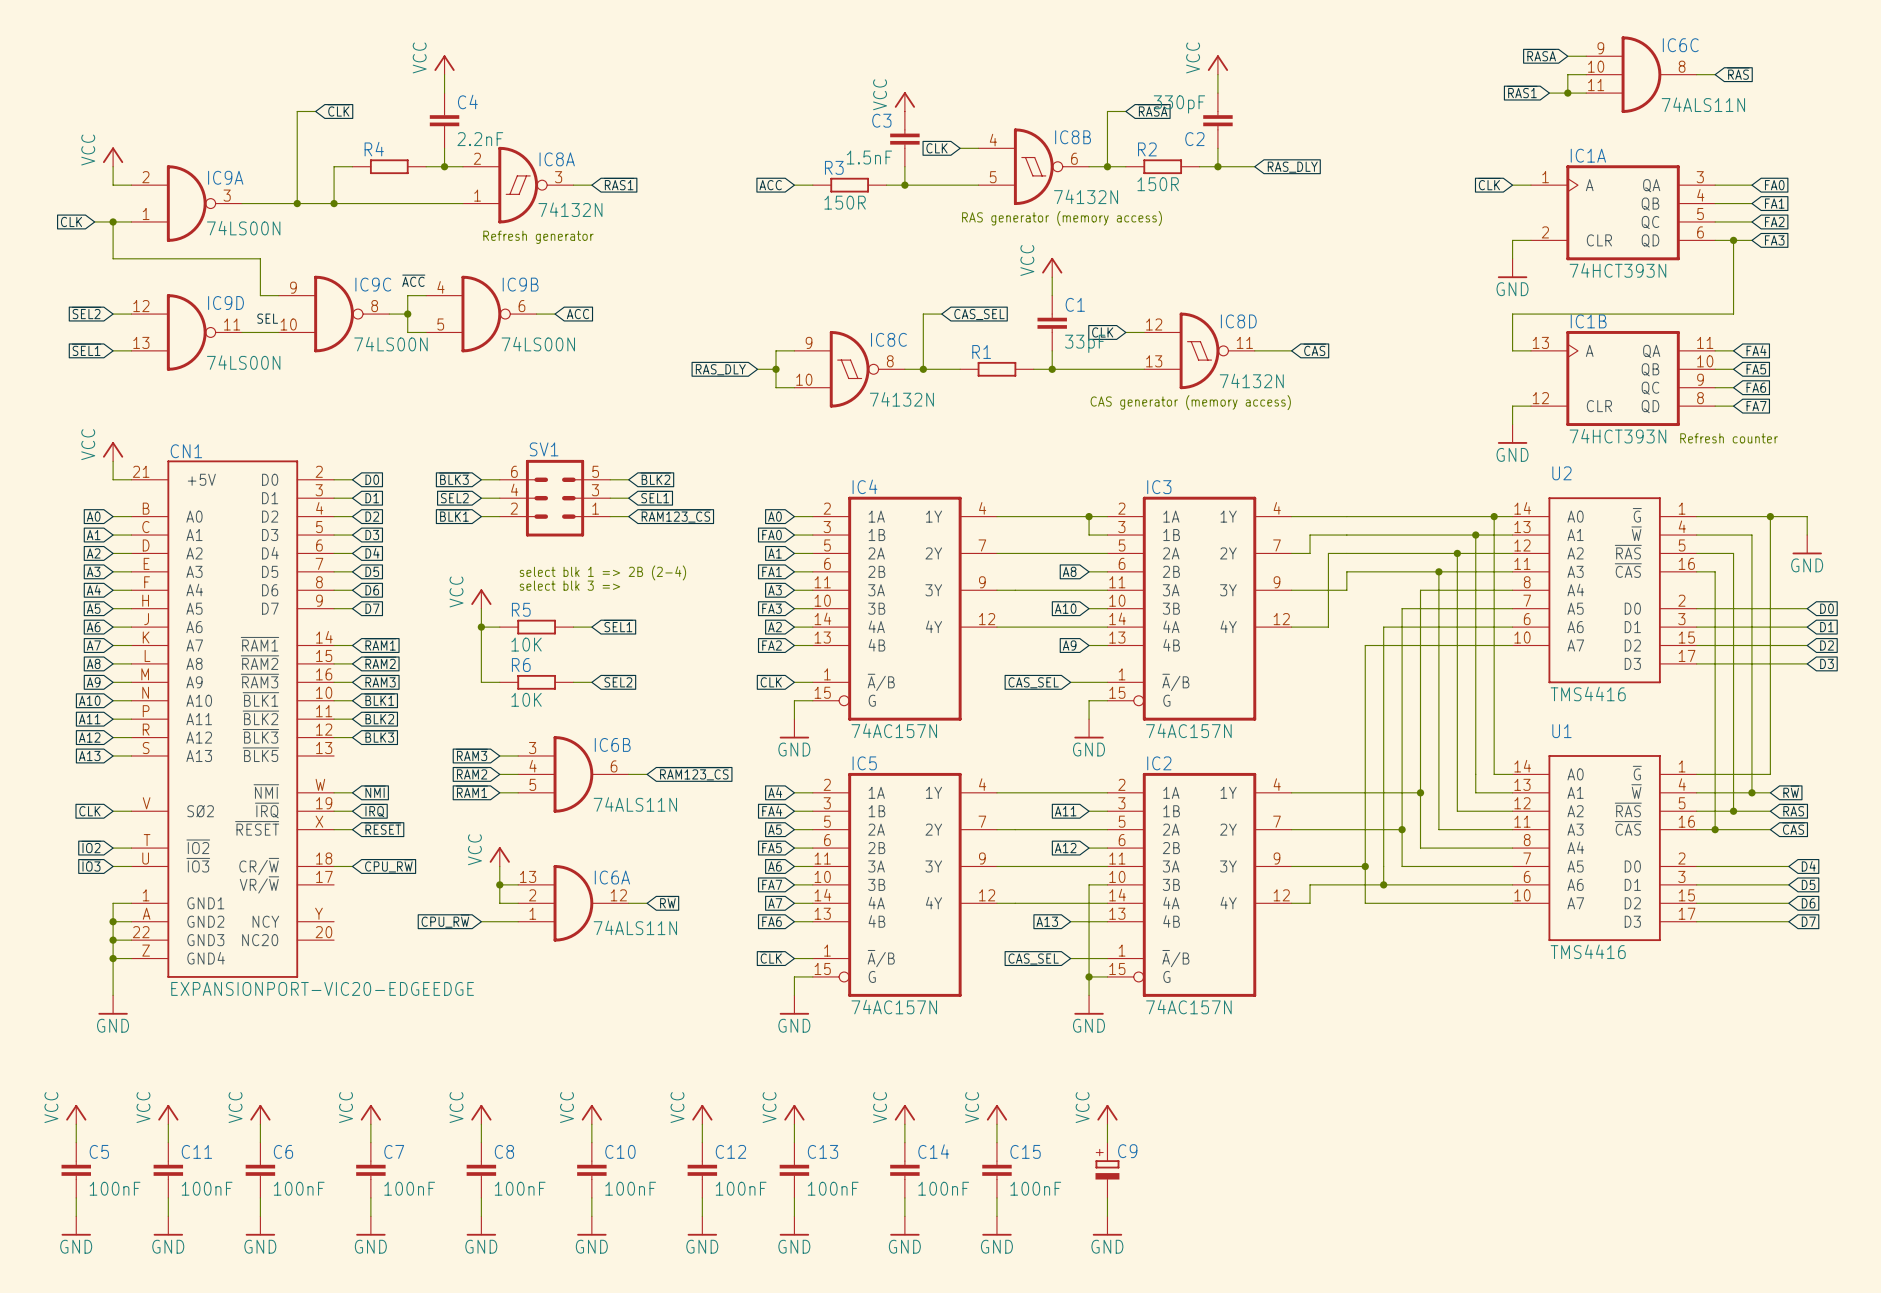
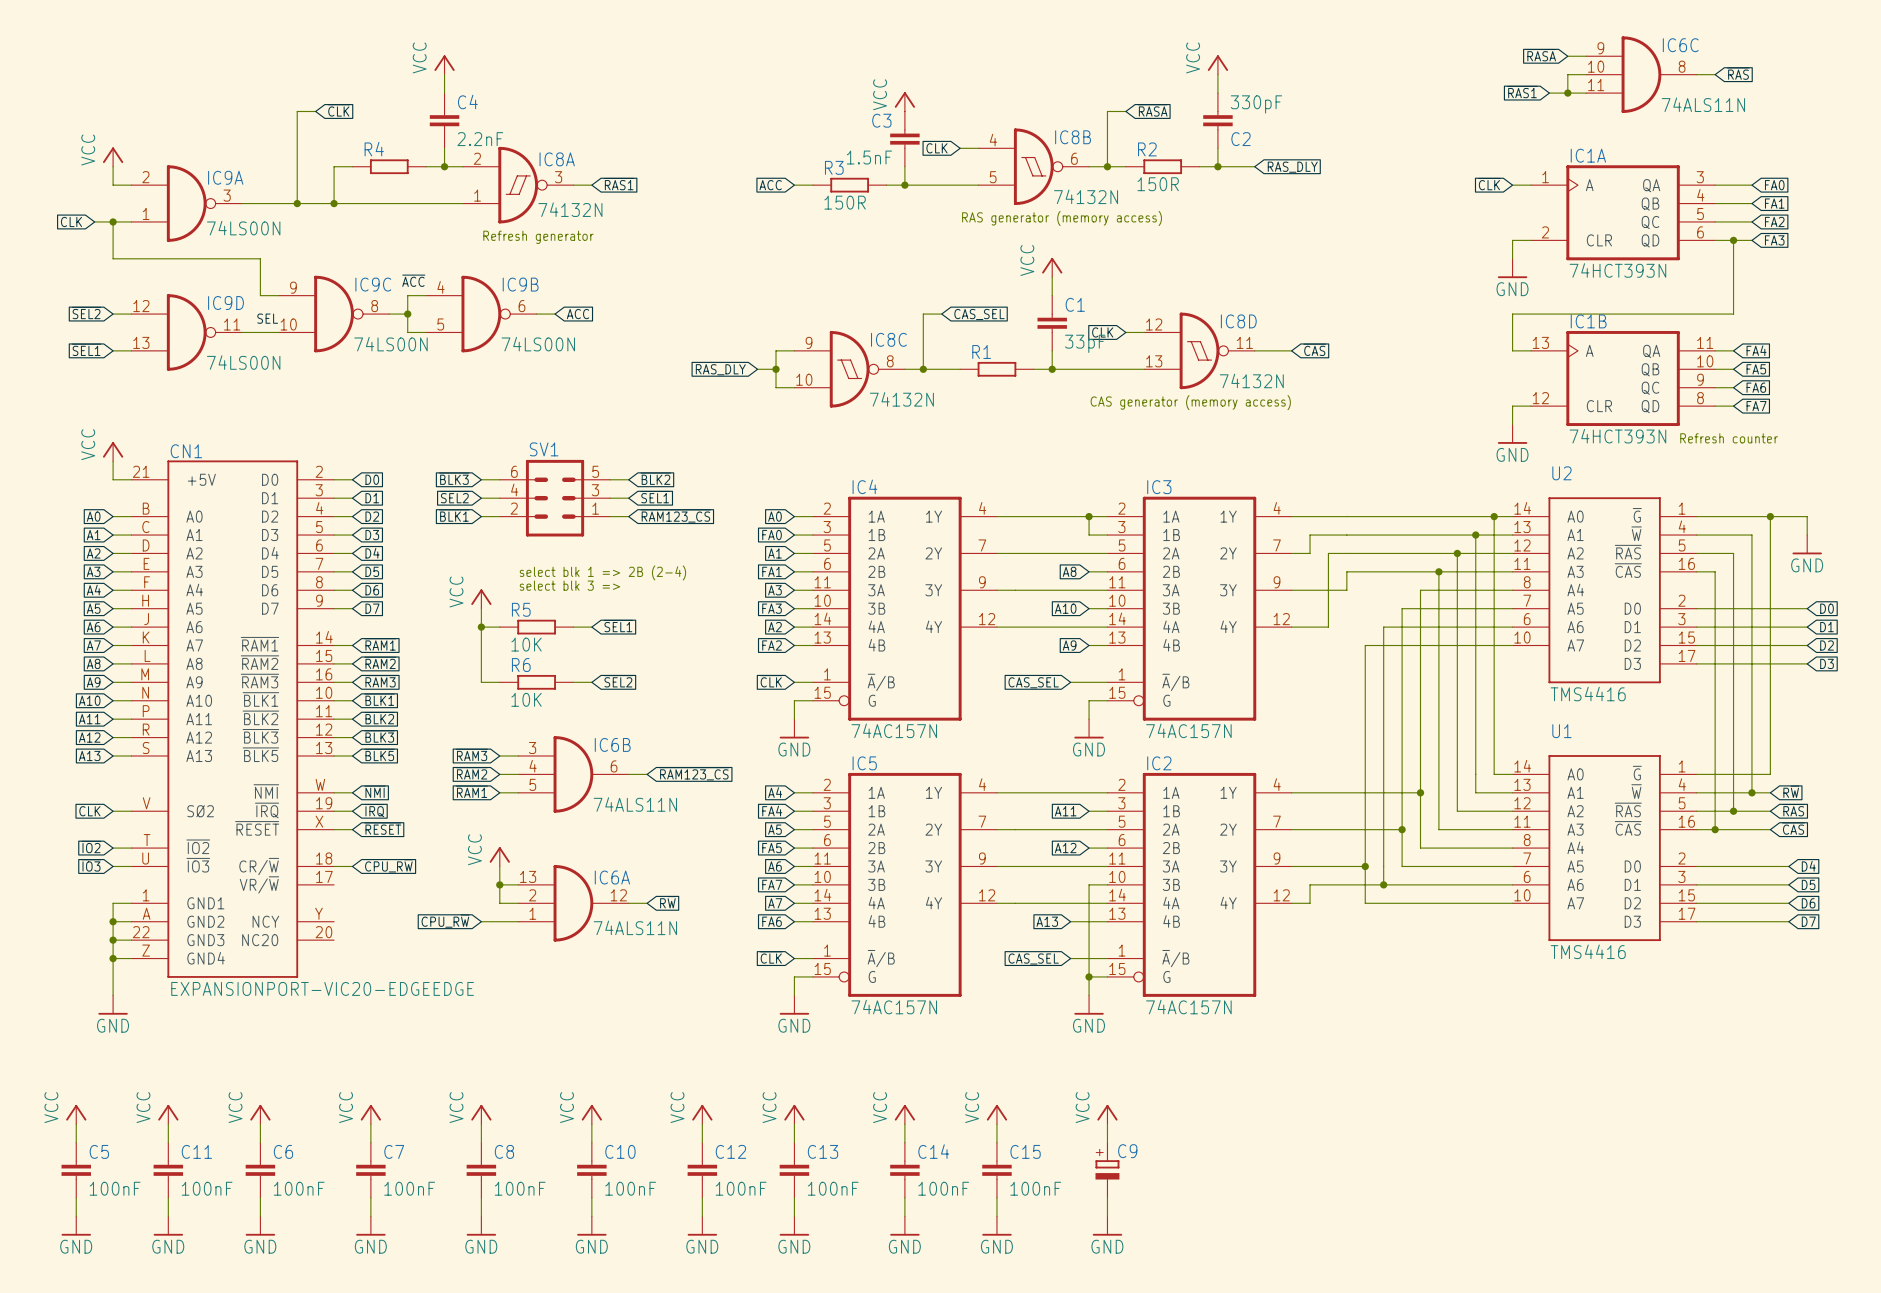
C2 value position: 330pF (1179, 104) -> 330pF (1256, 104)
C2 name position: C2 (1194, 139) -> C2 (1241, 139)
global label: none -> ~{BLK5} (379, 754)
wire: none -> (334, 755) (352, 755)

